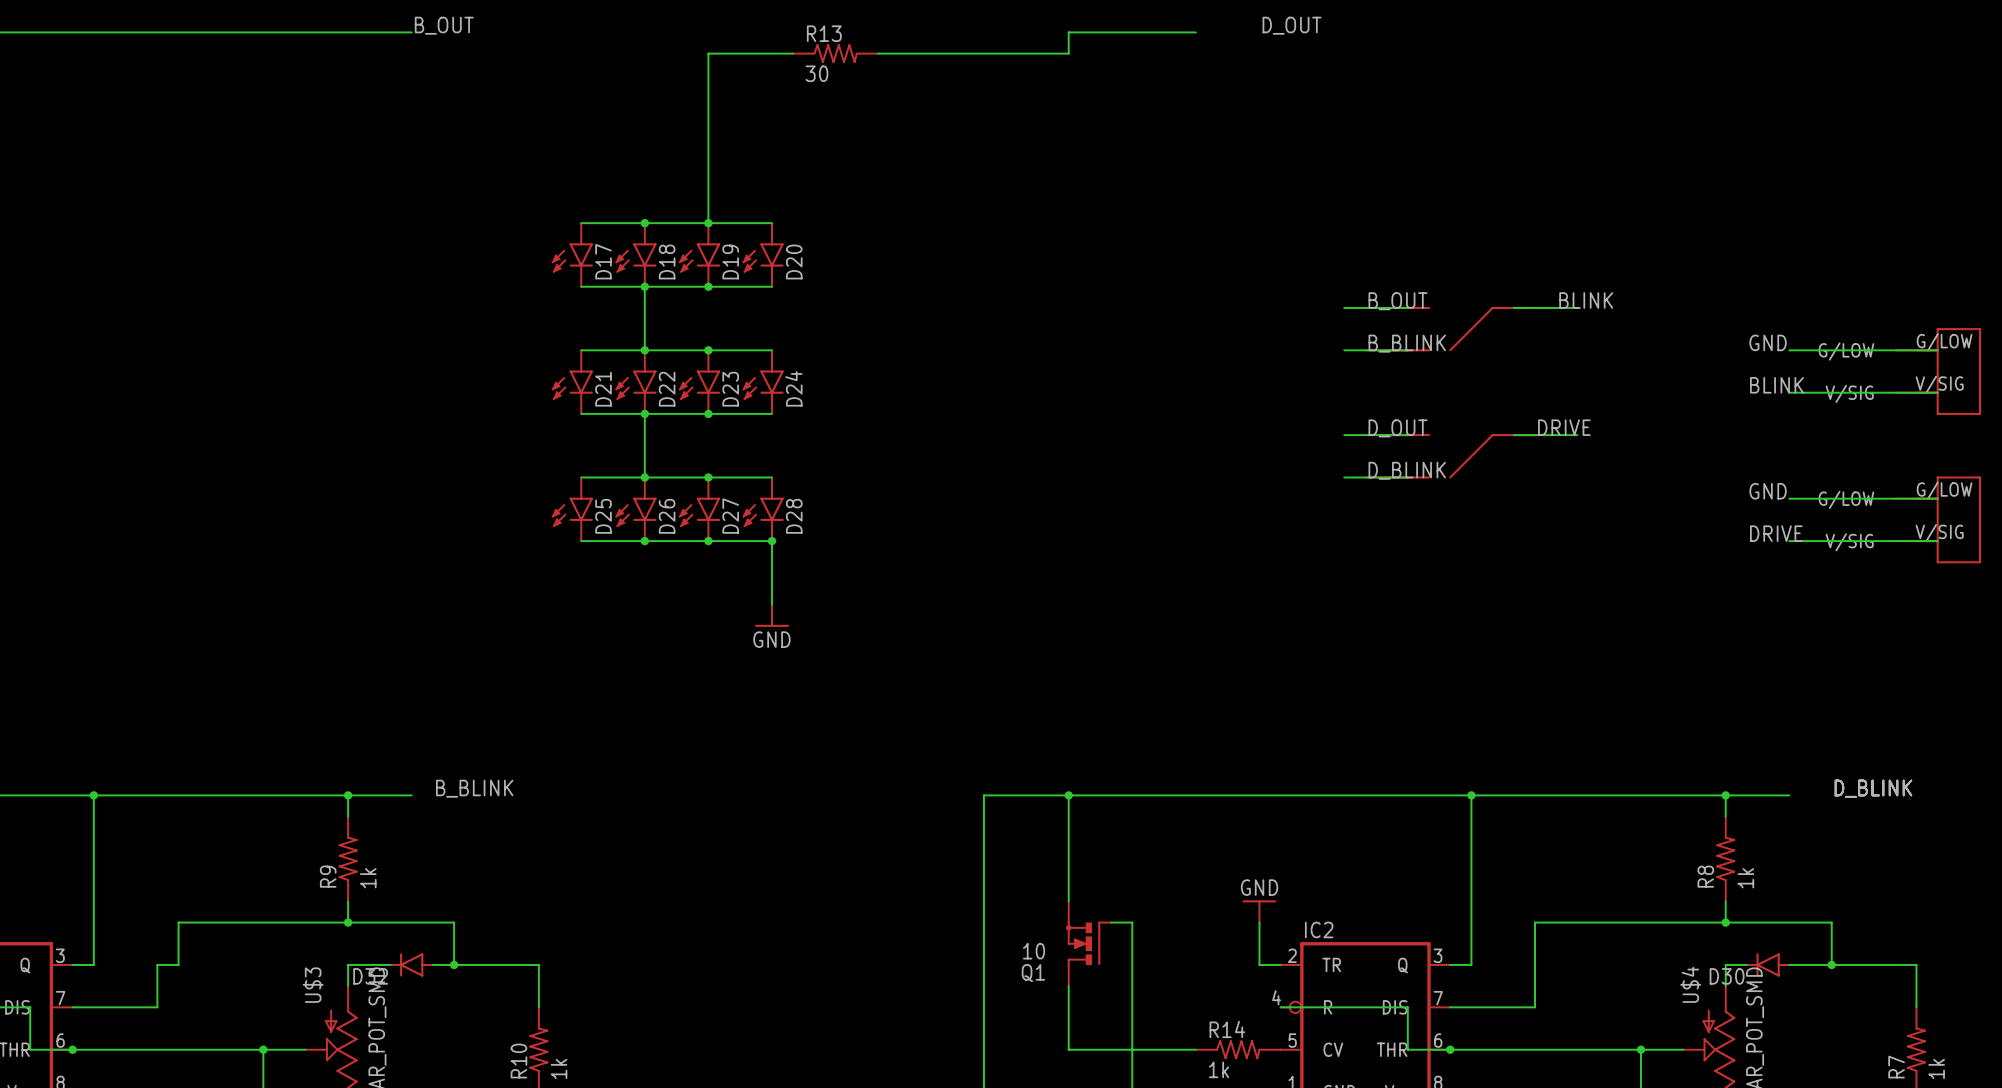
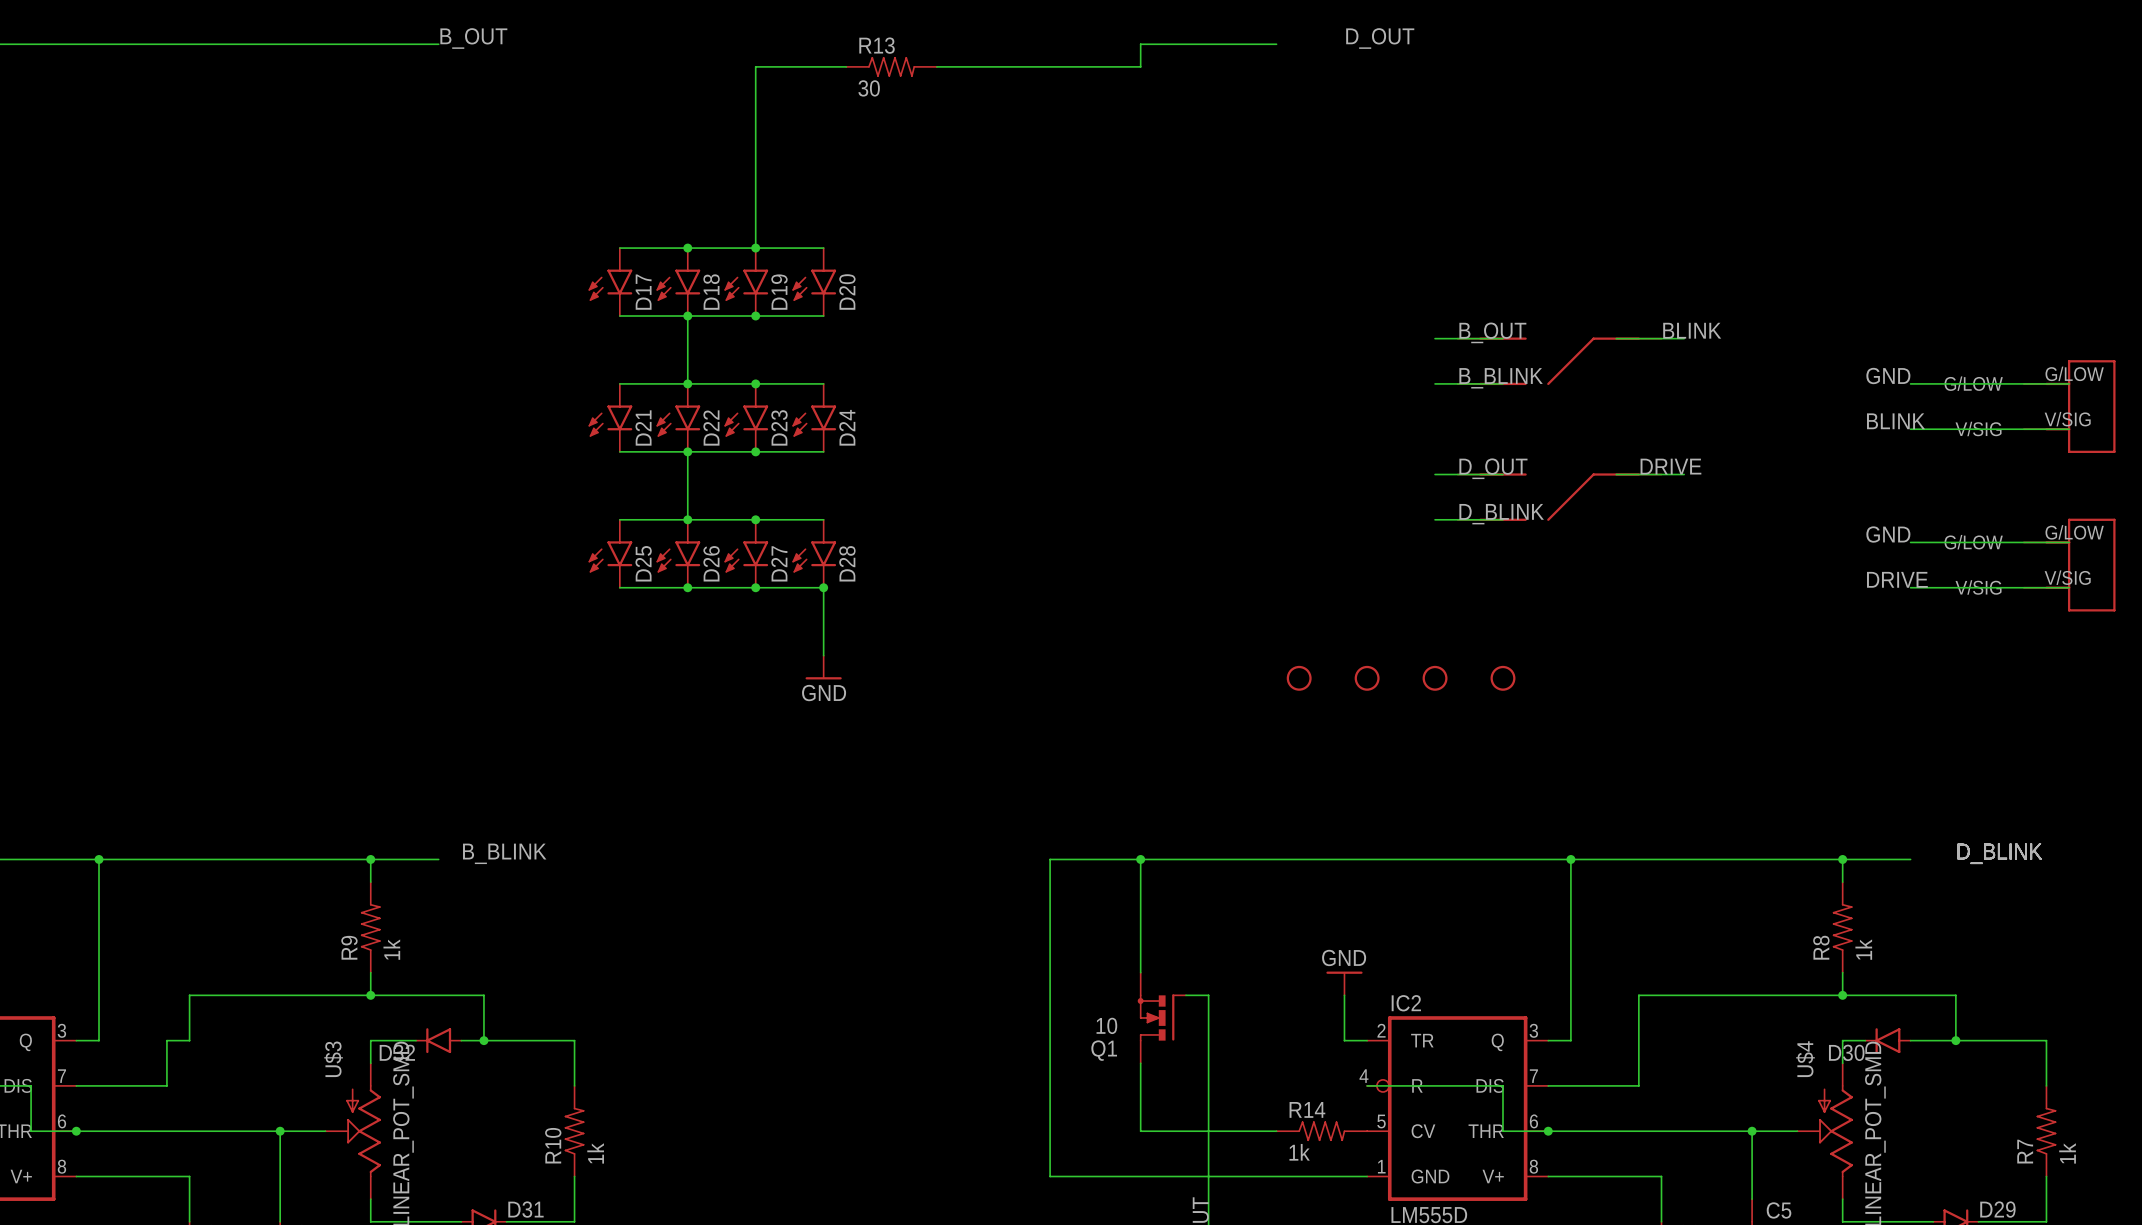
part: none -> (1299, 678)
part: none -> (1367, 678)
part: none -> (1435, 678)
part: none -> (1502, 678)

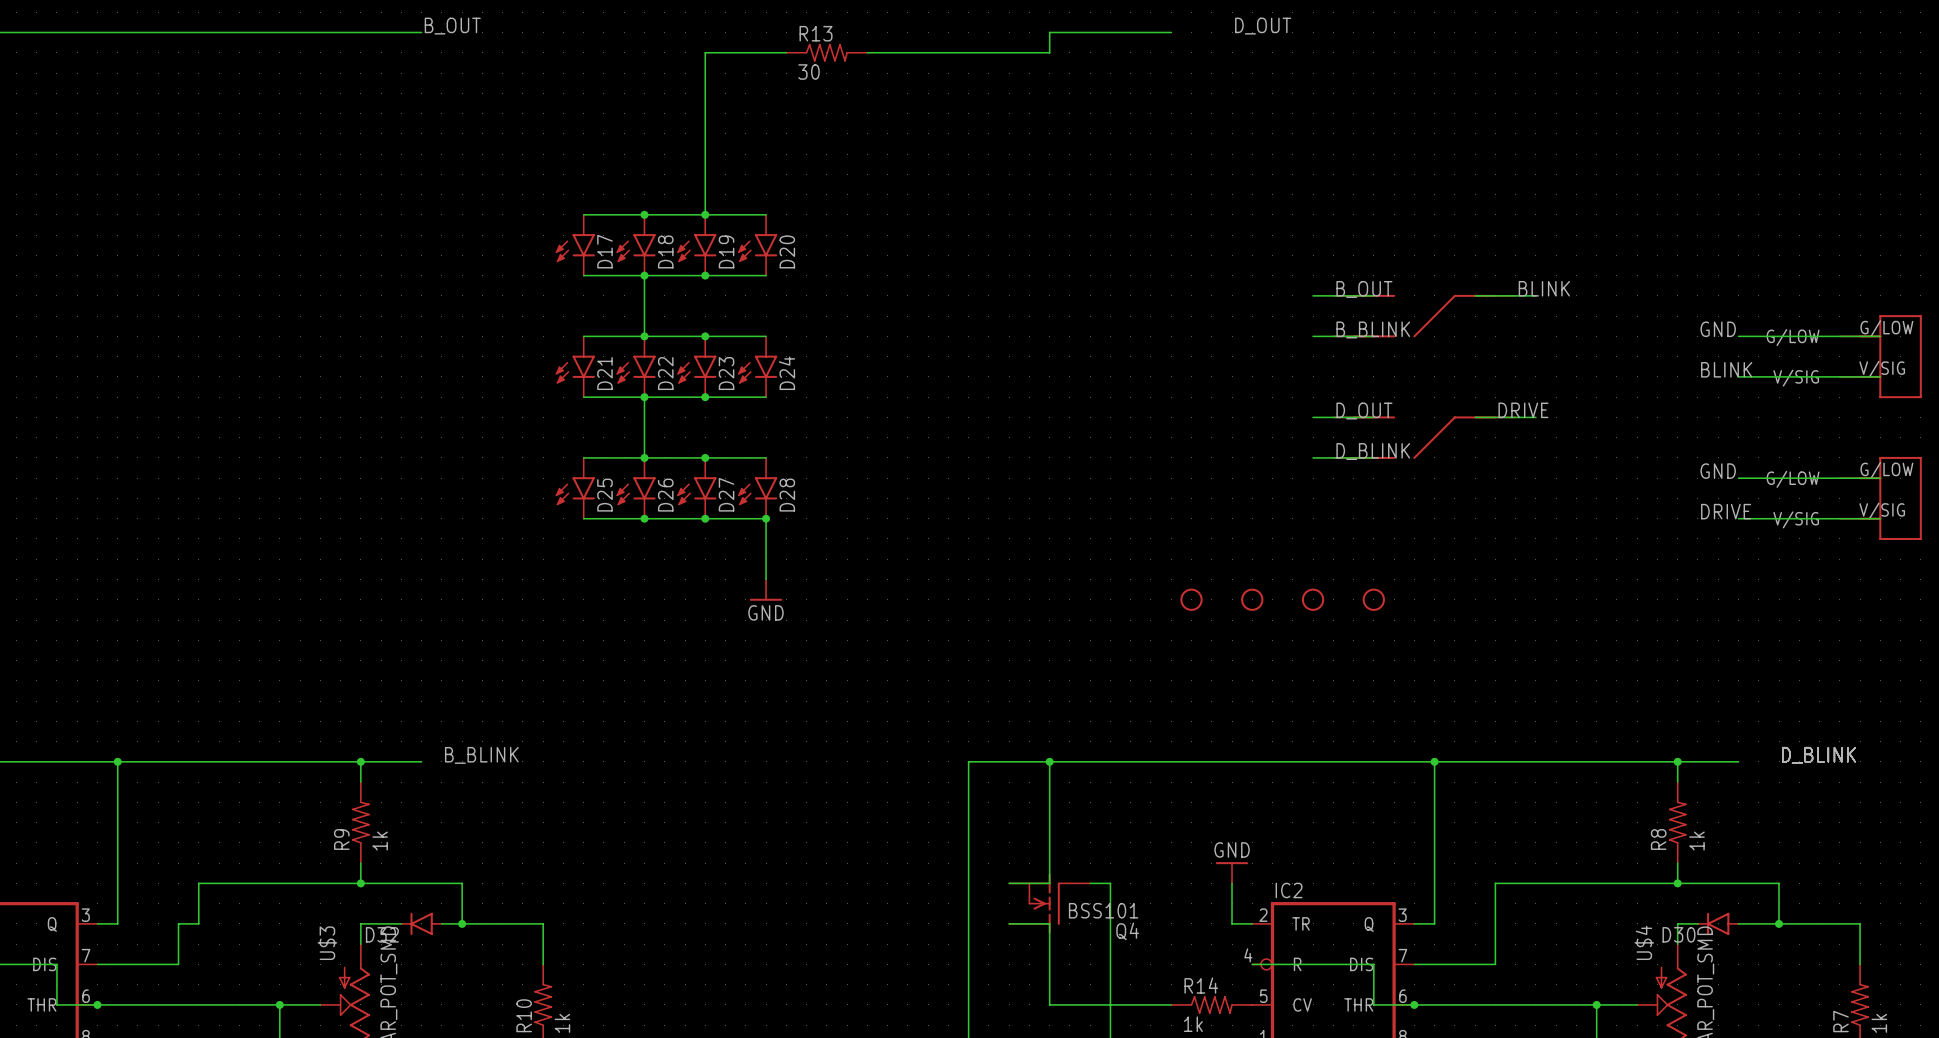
wire: none -> (1049, 863) (1049, 883) (1009, 883)
Q4: none -> BSS101 (1049, 903)
Q1: 10 (1162, 1017) -> none
wire: none -> (1009, 923) (1049, 923) (1049, 944)

